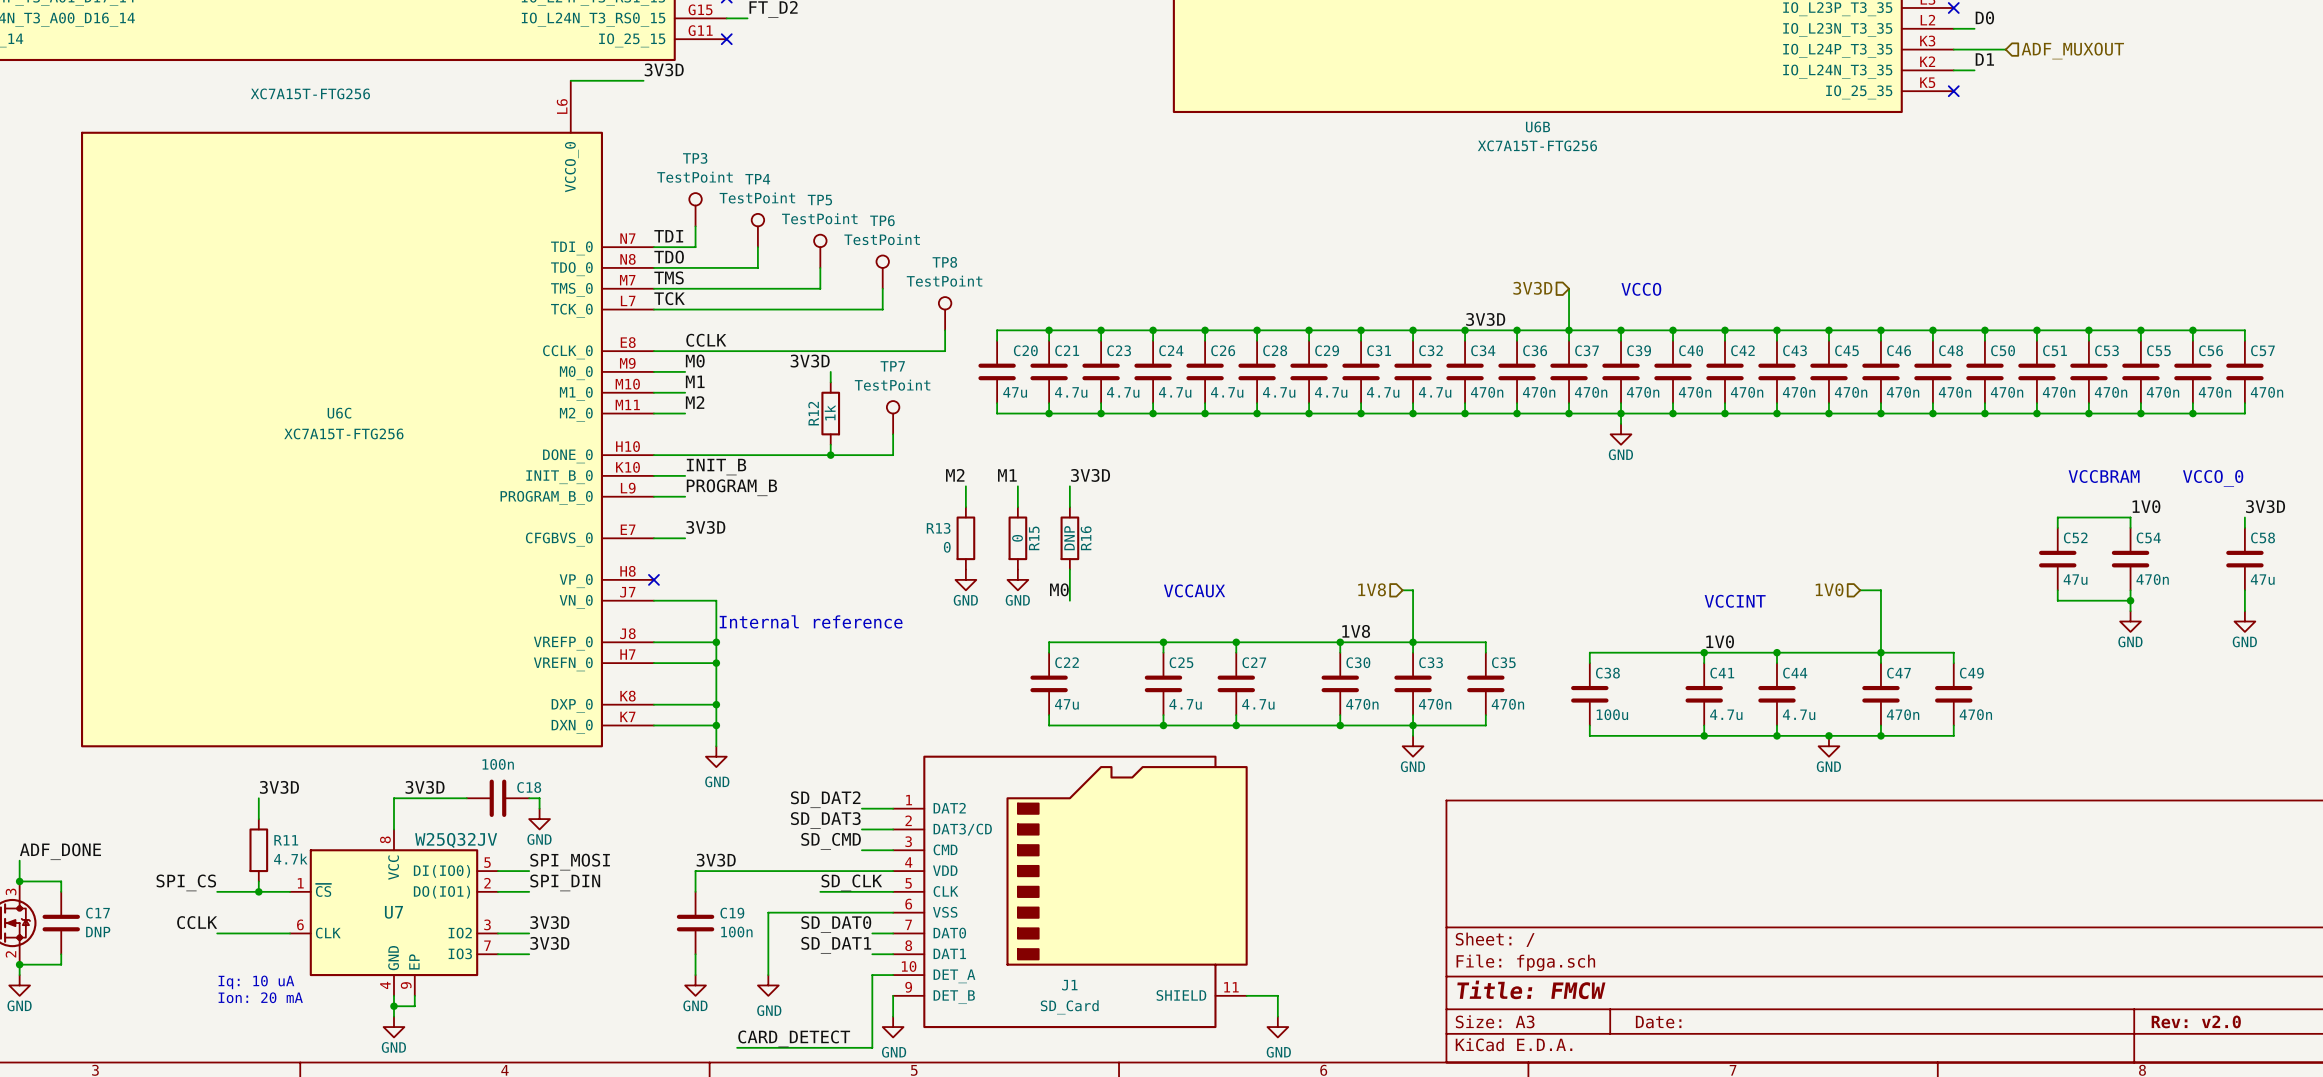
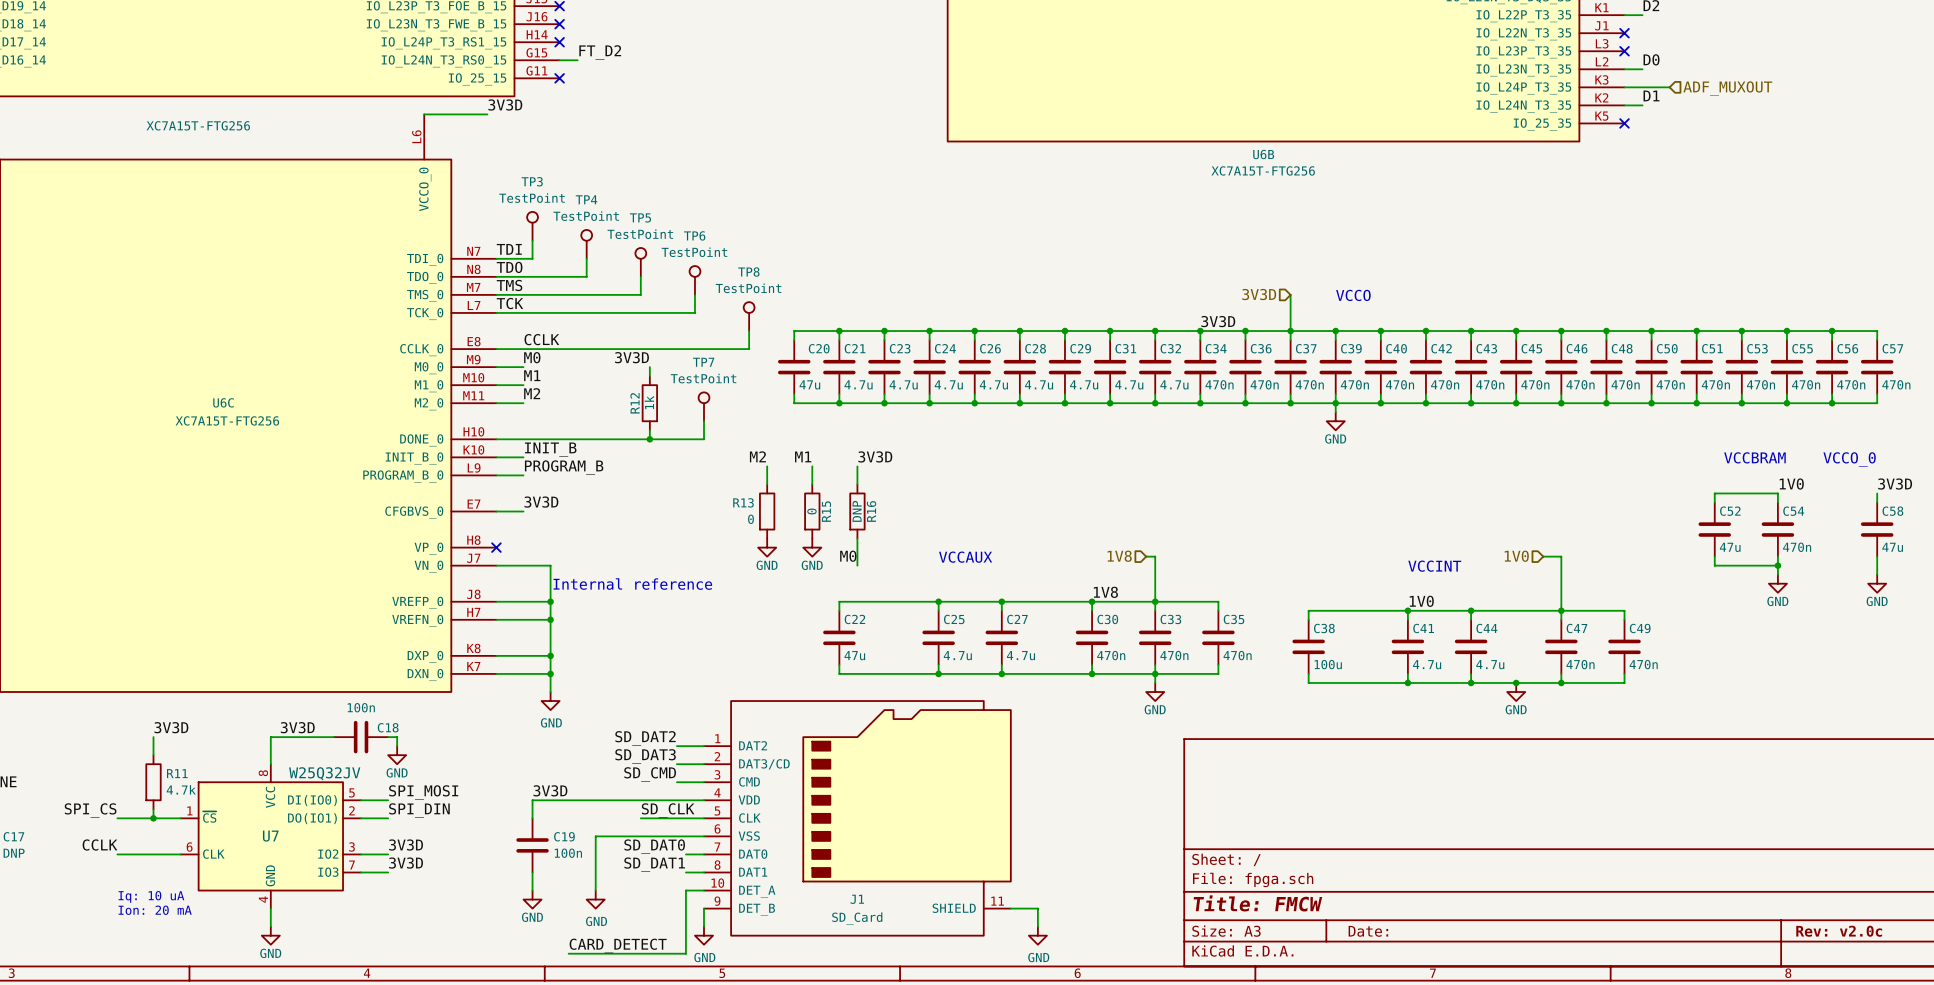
U7 symbol: [290, 829, 498, 996] -> [180, 764, 362, 909]
wire: (414, 995) (414, 1006) (393, 1006) -> none
junction: (393, 1006) -> none
title block: Rev: v2.0 (2196, 1021) -> Rev: v2.0c (1839, 931)

